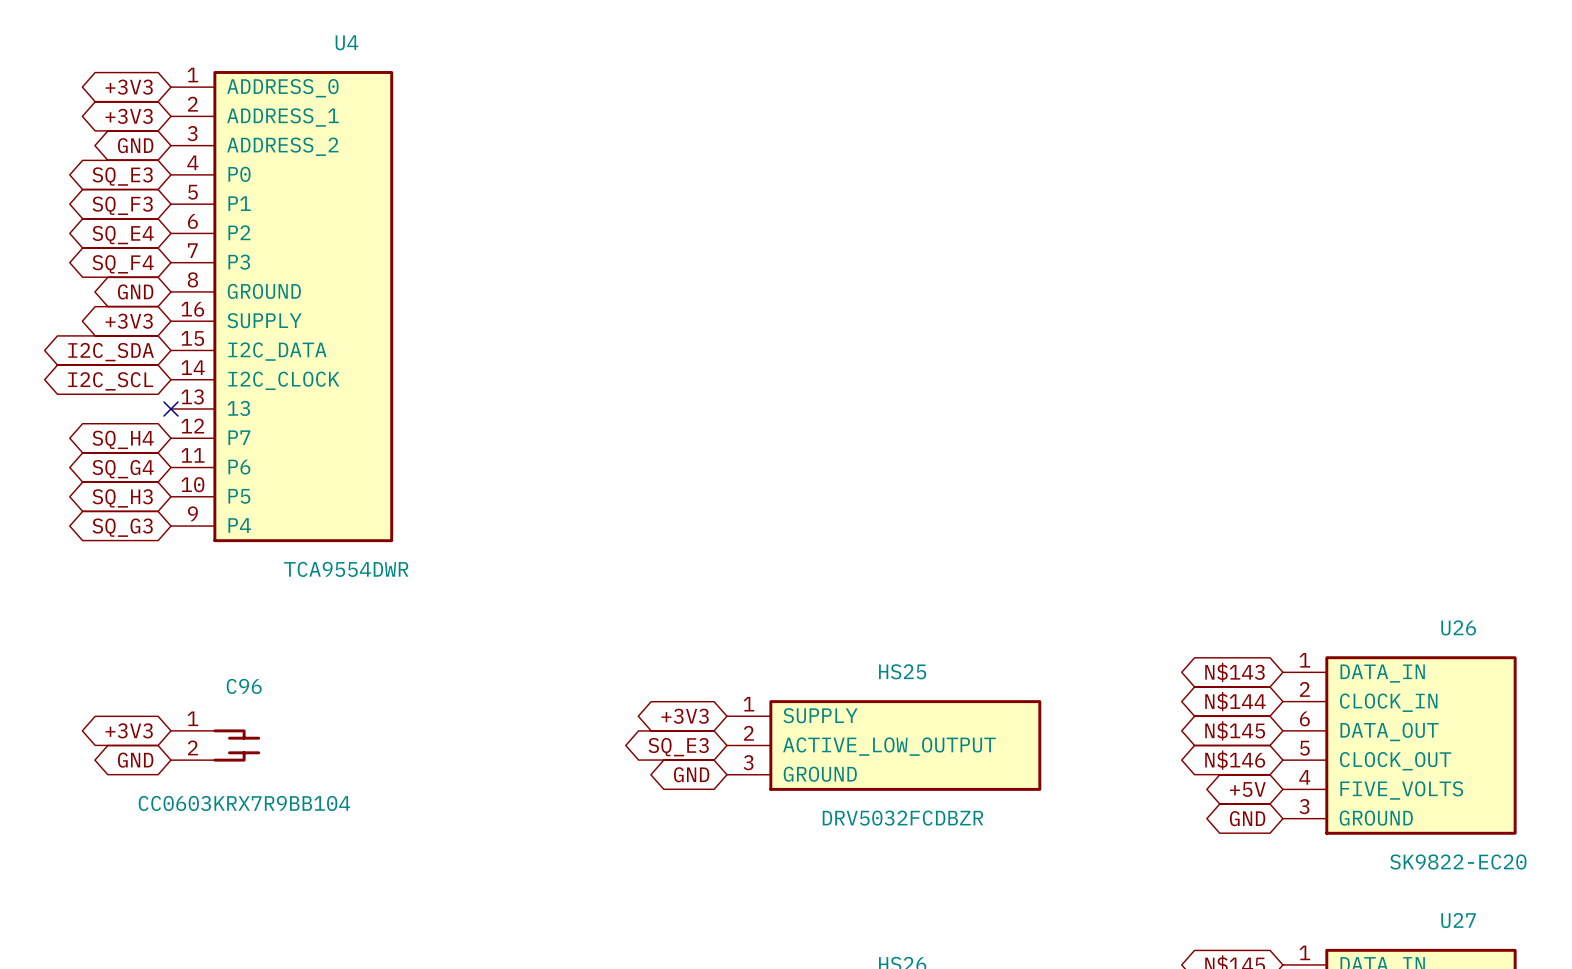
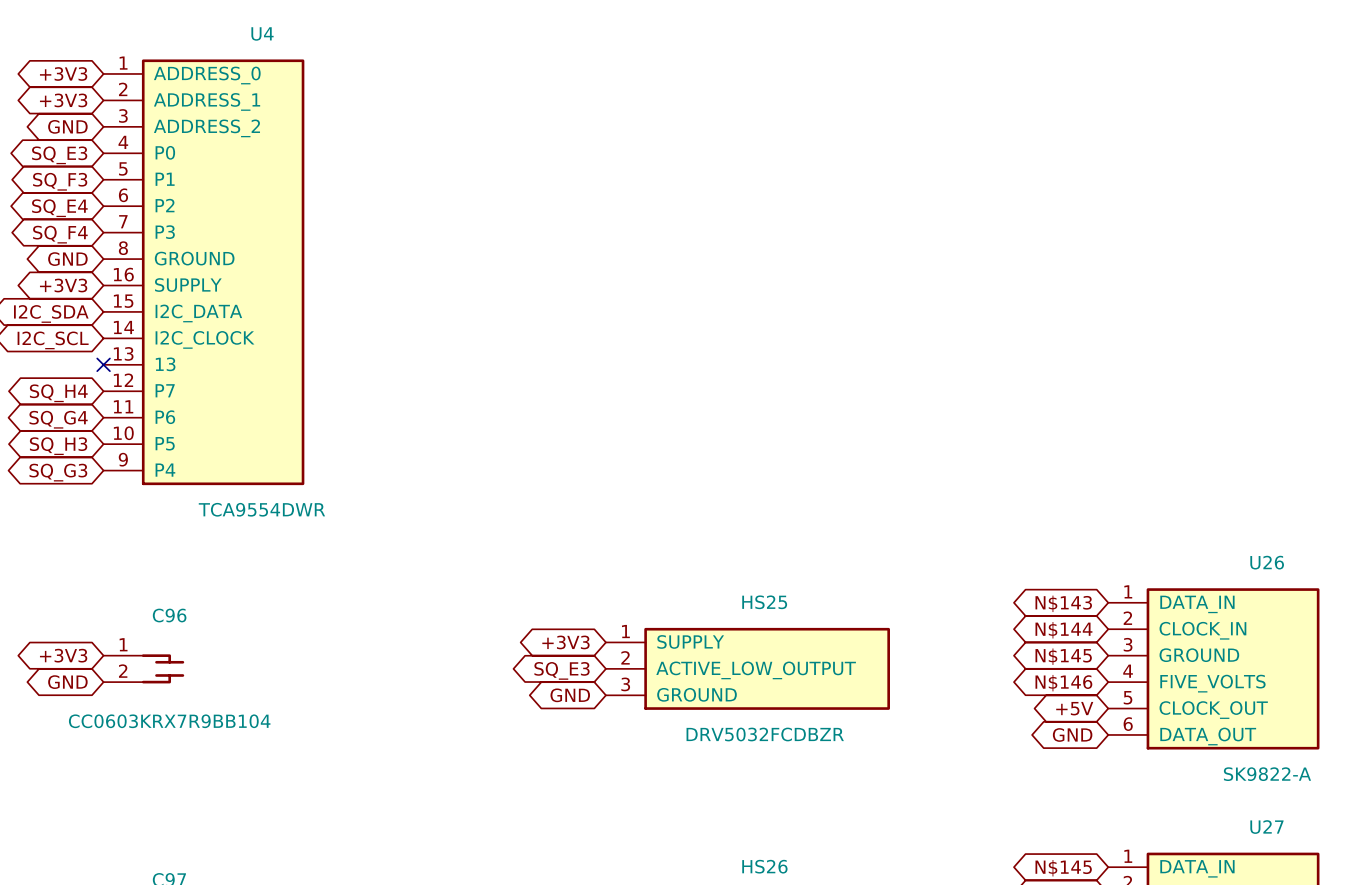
U26 pin number: 6 (1304, 718) -> 3 (1128, 644)
U26 pin name: DATA_OUT (1389, 731) -> GROUND (1199, 655)
U26 pin number: 5 (1304, 748) -> 4 (1128, 671)
U26 pin name: CLOCK_OUT (1395, 761) -> FIVE_VOLTS (1212, 683)
U26 pin number: 4 (1304, 777) -> 5 (1128, 697)
U26 pin name: FIVE_VOLTS (1401, 790) -> CLOCK_OUT (1213, 710)
U26 pin number: 3 (1304, 806) -> 6 (1128, 724)
U26 pin name: GROUND (1376, 818) -> DATA_OUT (1208, 736)
U26 value: SK9822-EC20 (1458, 862) -> SK9822-A (1267, 774)

